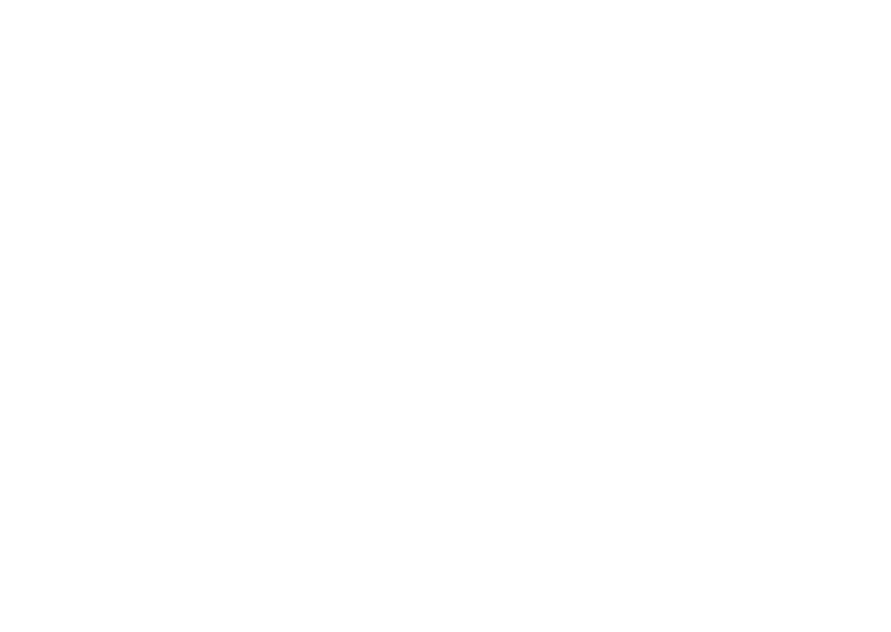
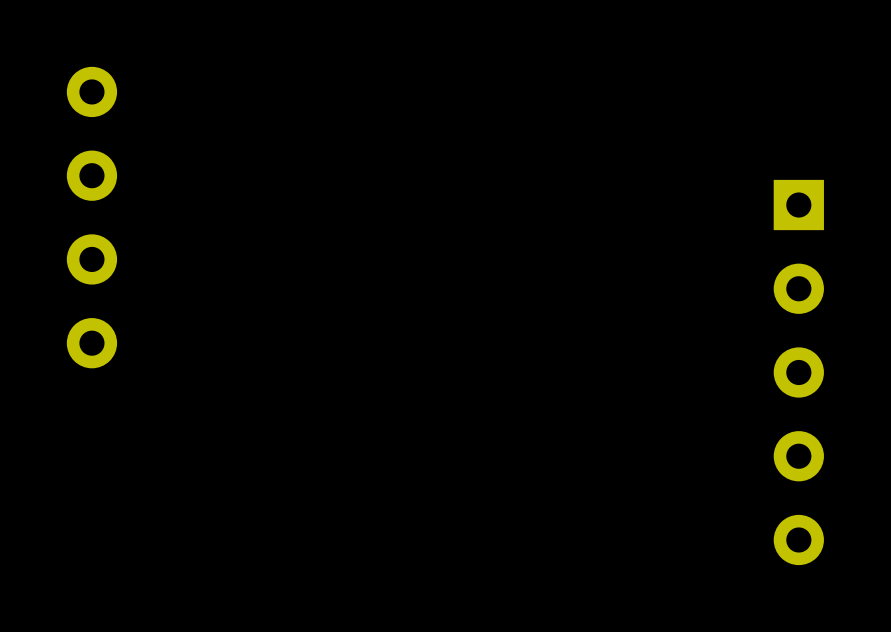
part: none -> (91, 217)
part: none -> (798, 372)

